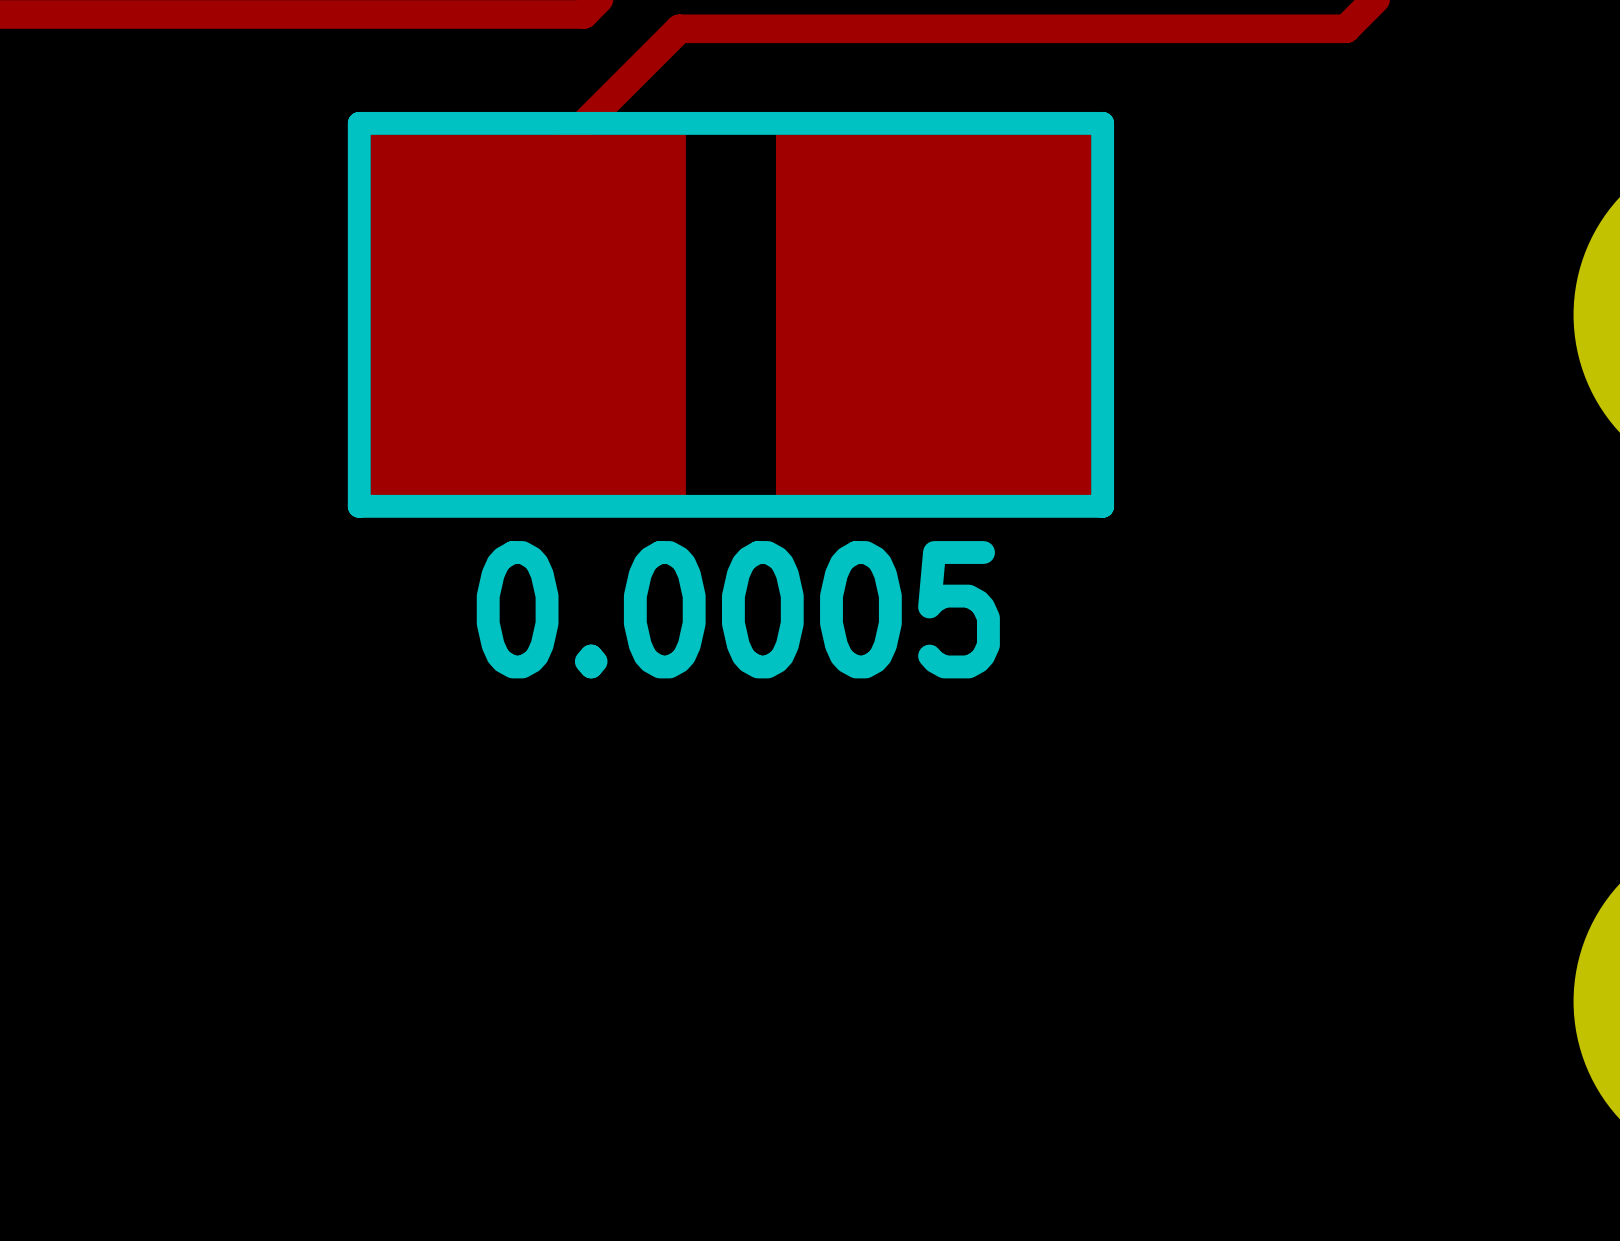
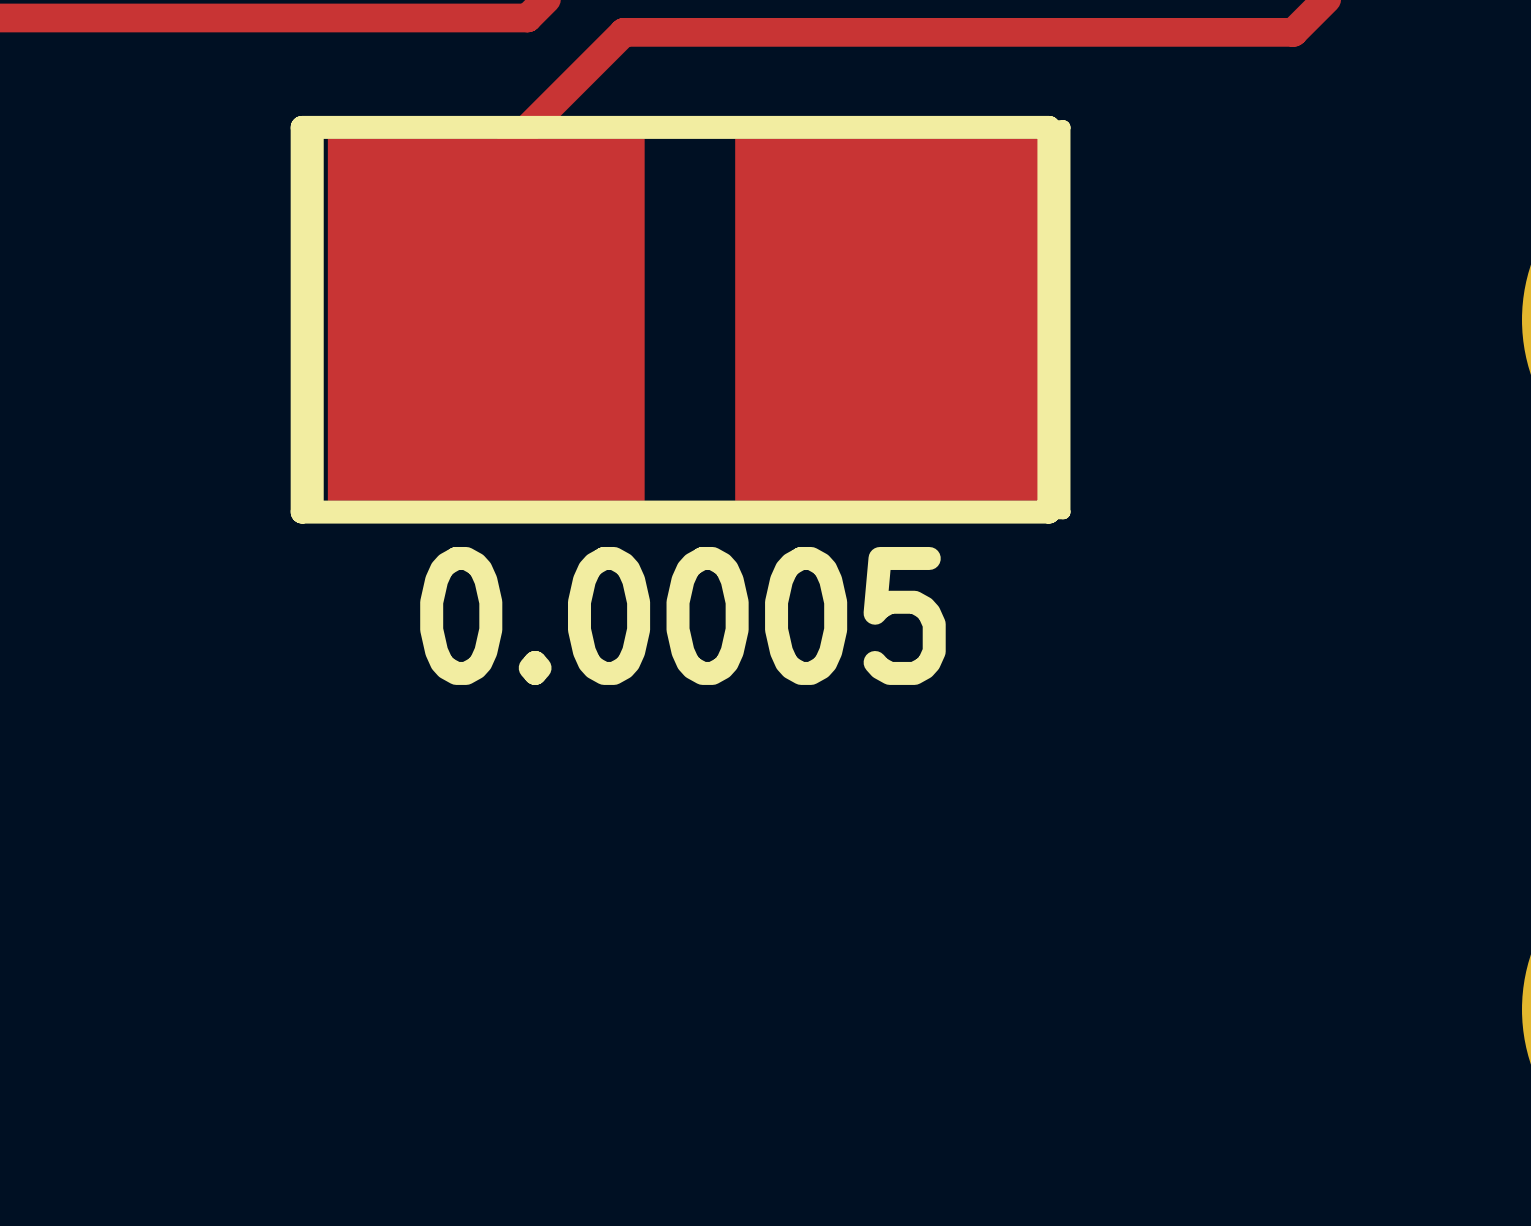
part position: (730, 314) -> (689, 319)

